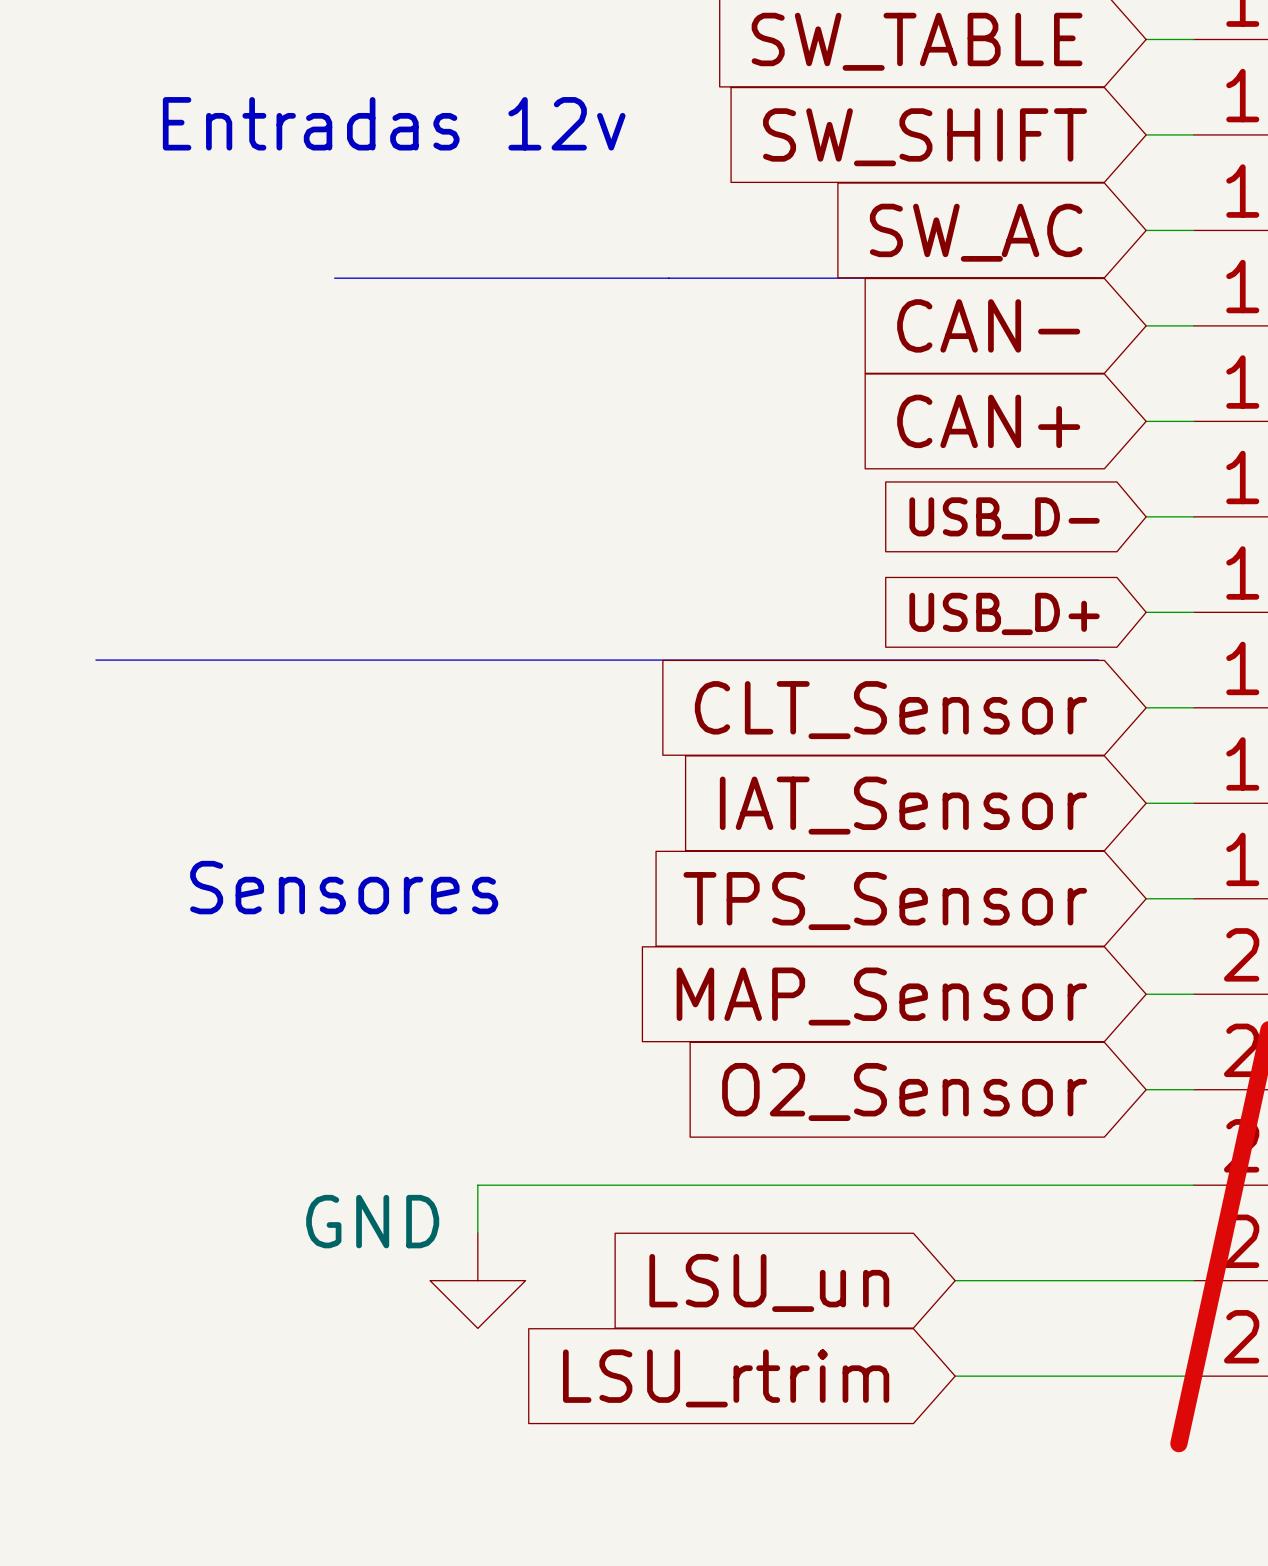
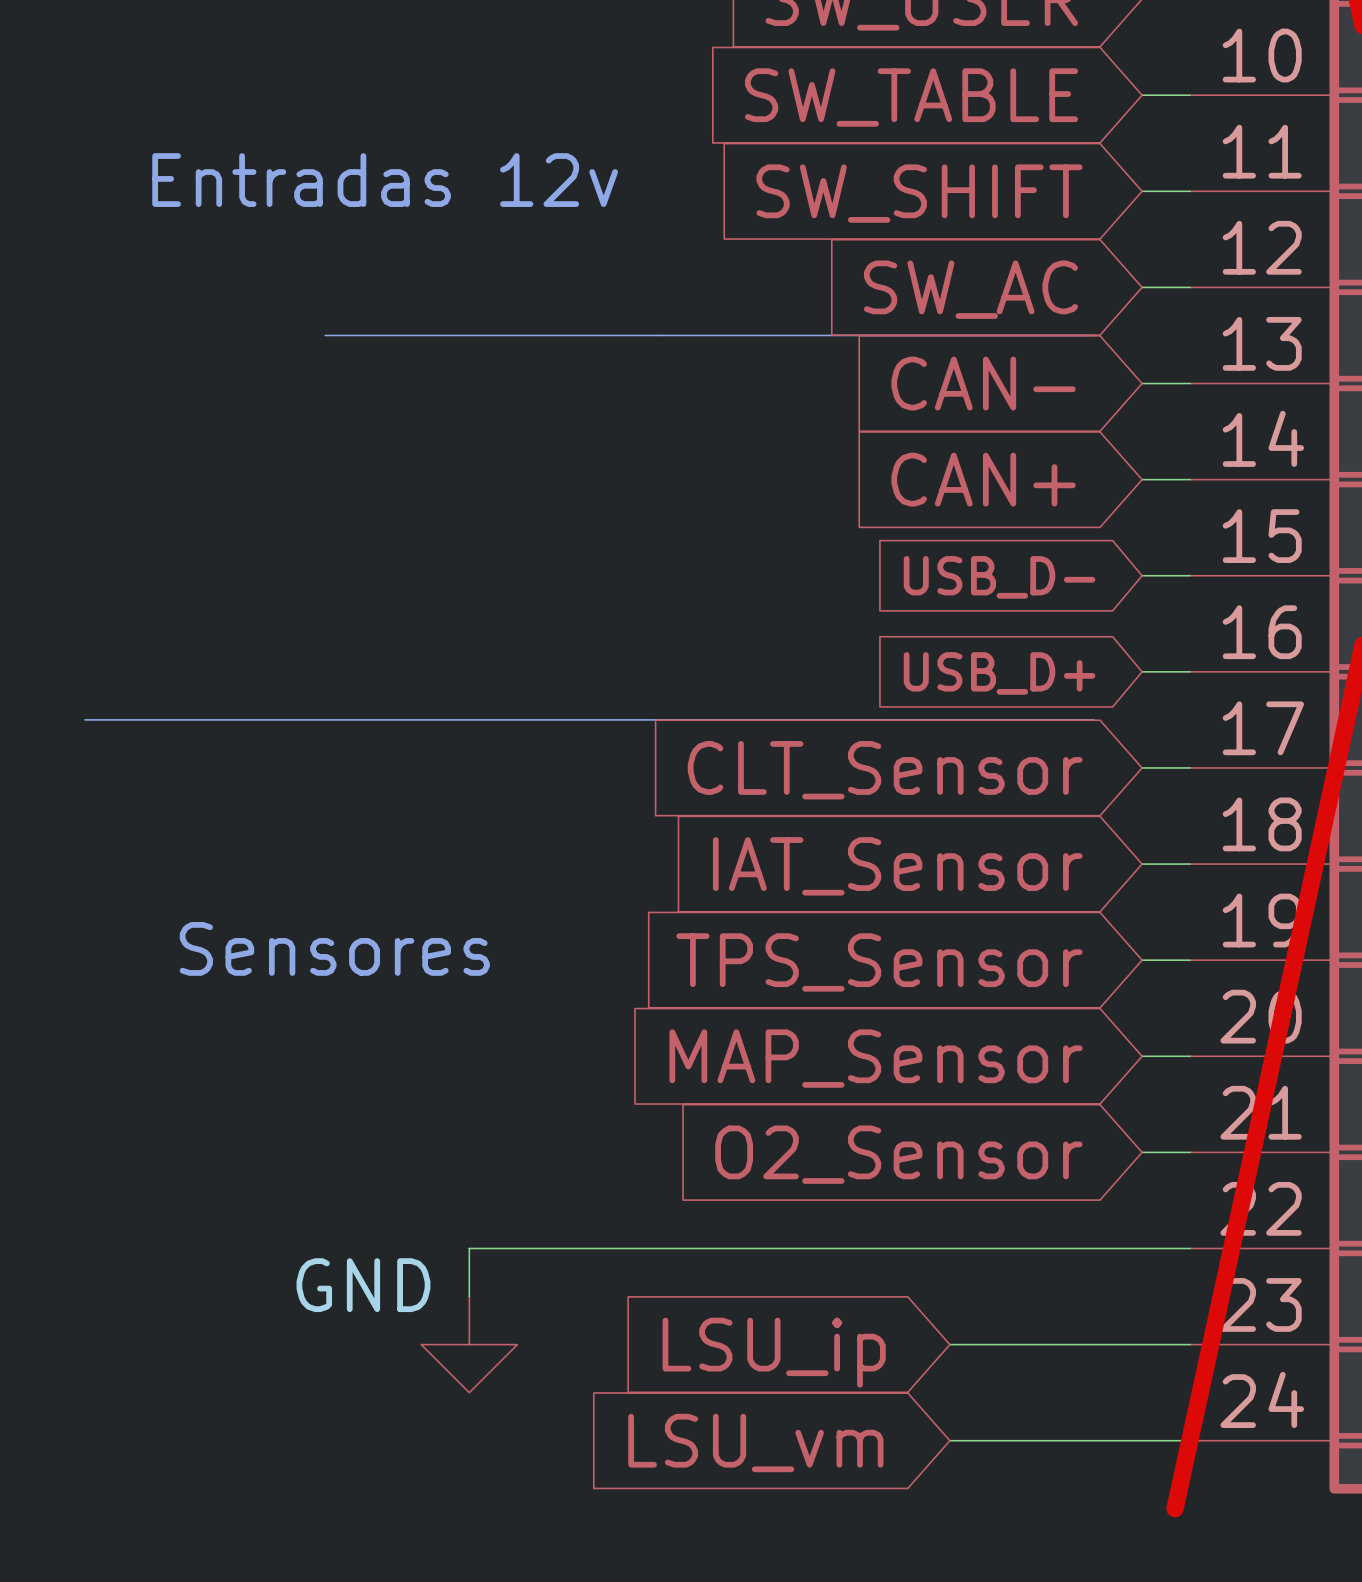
global label: LSU_un (769, 1282) -> LSU_ip (774, 1352)
global label: LSU_rtrim (726, 1378) -> LSU_vm (755, 1443)

